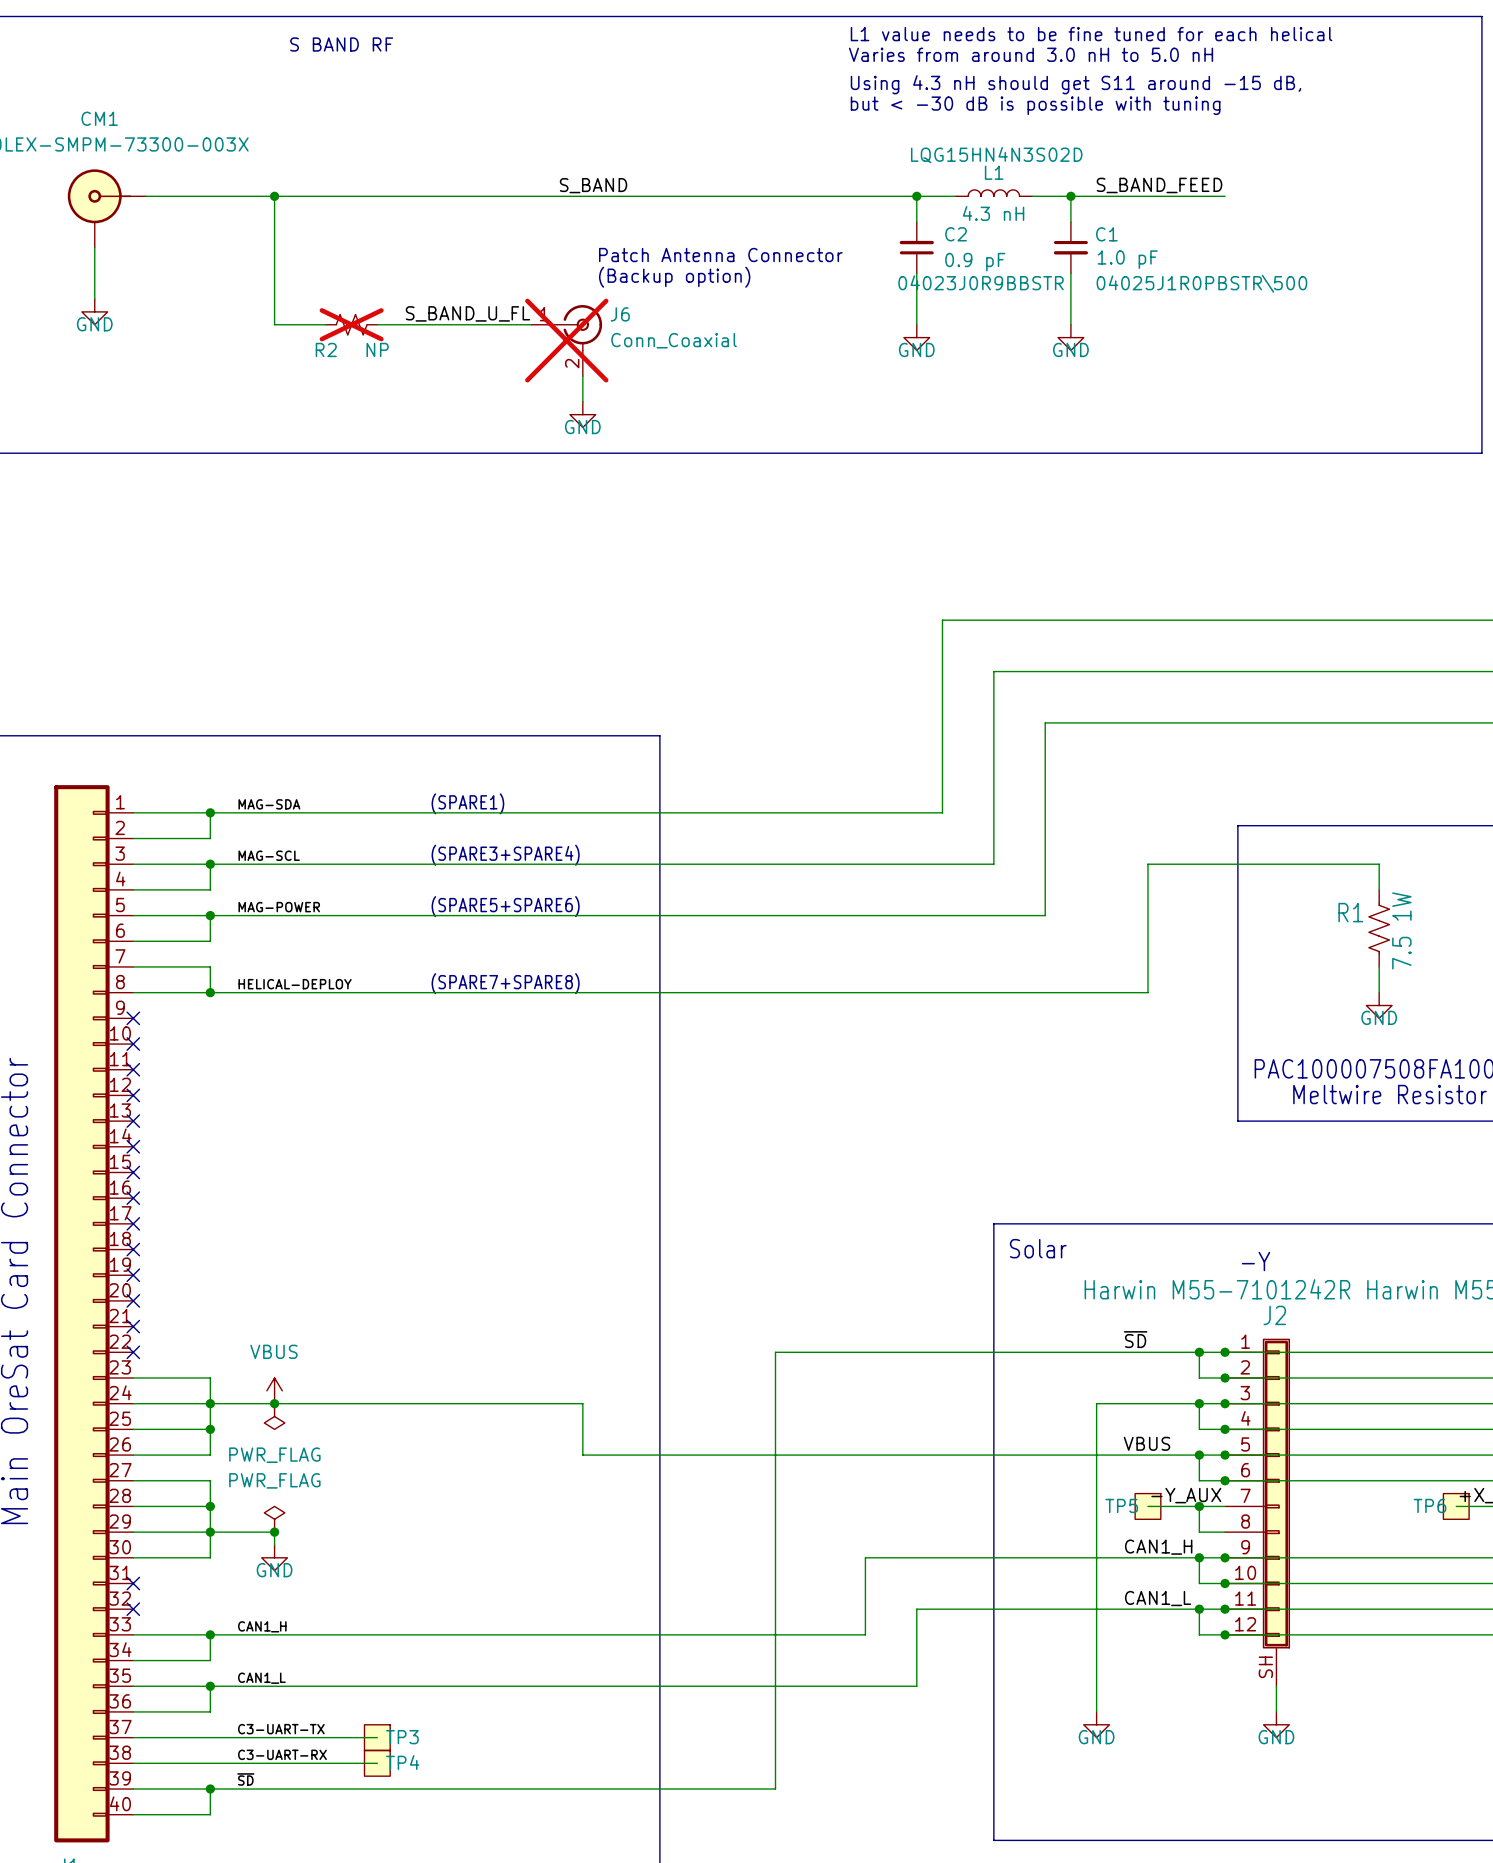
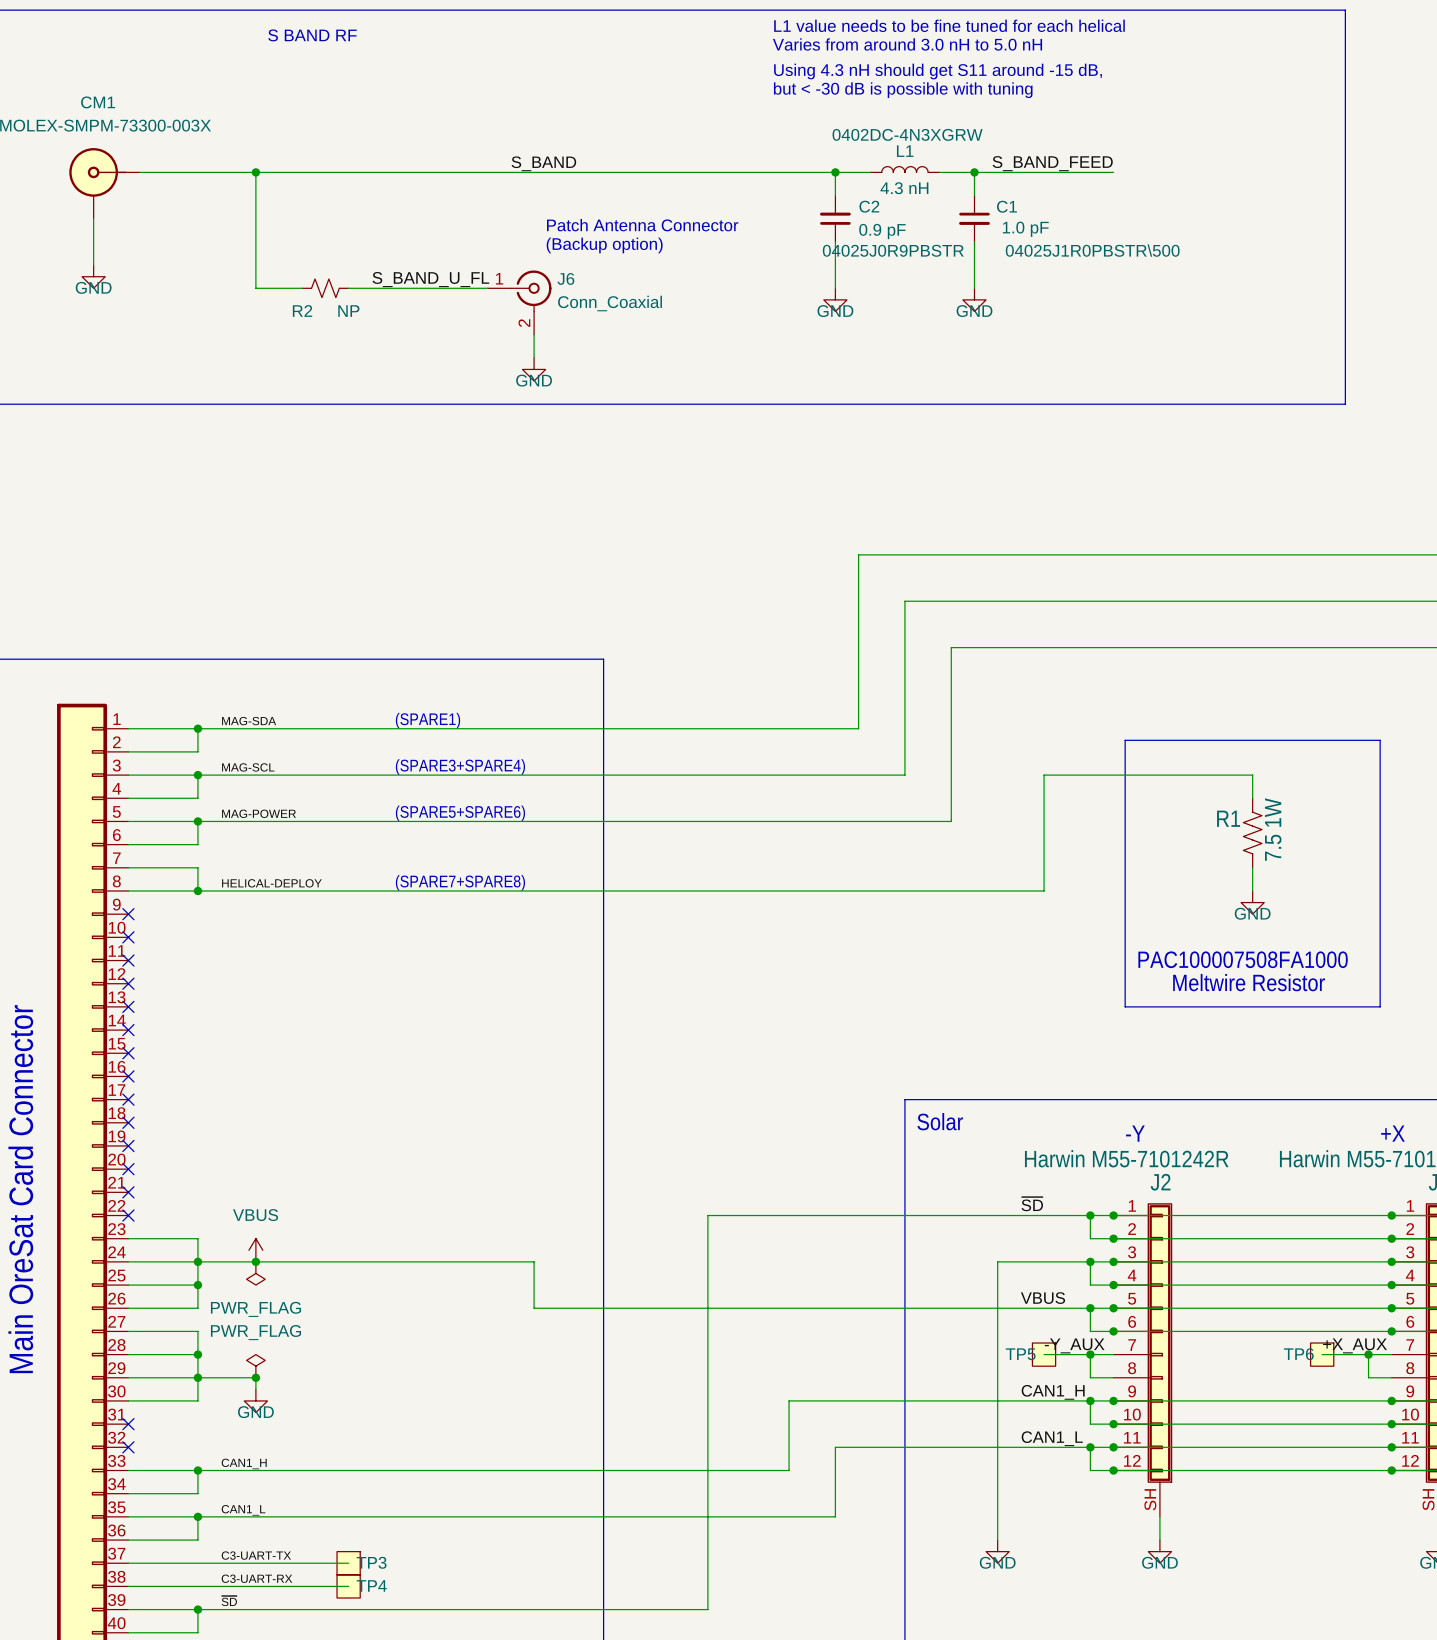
L1 text: LQG15HN4N3S02D (996, 155) -> 0402DC-4N3XGRW (907, 134)
C2 text: 04023J0R9BBSTR (981, 282) -> 04025J0R9PBSTR (893, 250)
R2 do-not-place cross: (351, 324) -> none
J6 do-not-place cross: (566, 340) -> none

